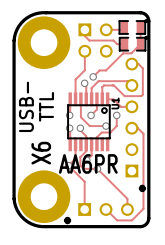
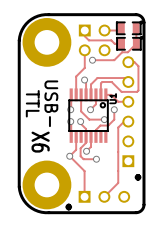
track: (125, 53) (106, 70) (99, 70) (93, 76) -> (122, 52) (114, 60) (92, 60)
via position: (93, 76) -> (92, 60)
text rotation: 0° (26, 106) -> 180° (51, 103)
text rotation: 0° (46, 106) -> 180° (32, 103)
track: (131, 128) (137, 128) (143, 133) (143, 208) (131, 220) (117, 220) (106, 209) -> (128, 121) (124, 121) (118, 127) (118, 182) (104, 196)
text rotation: 0° (41, 153) -> 180° (40, 142)
text: AA6PR (88, 163) -> none
track: (97, 168) (127, 198) (127, 209) -> none

